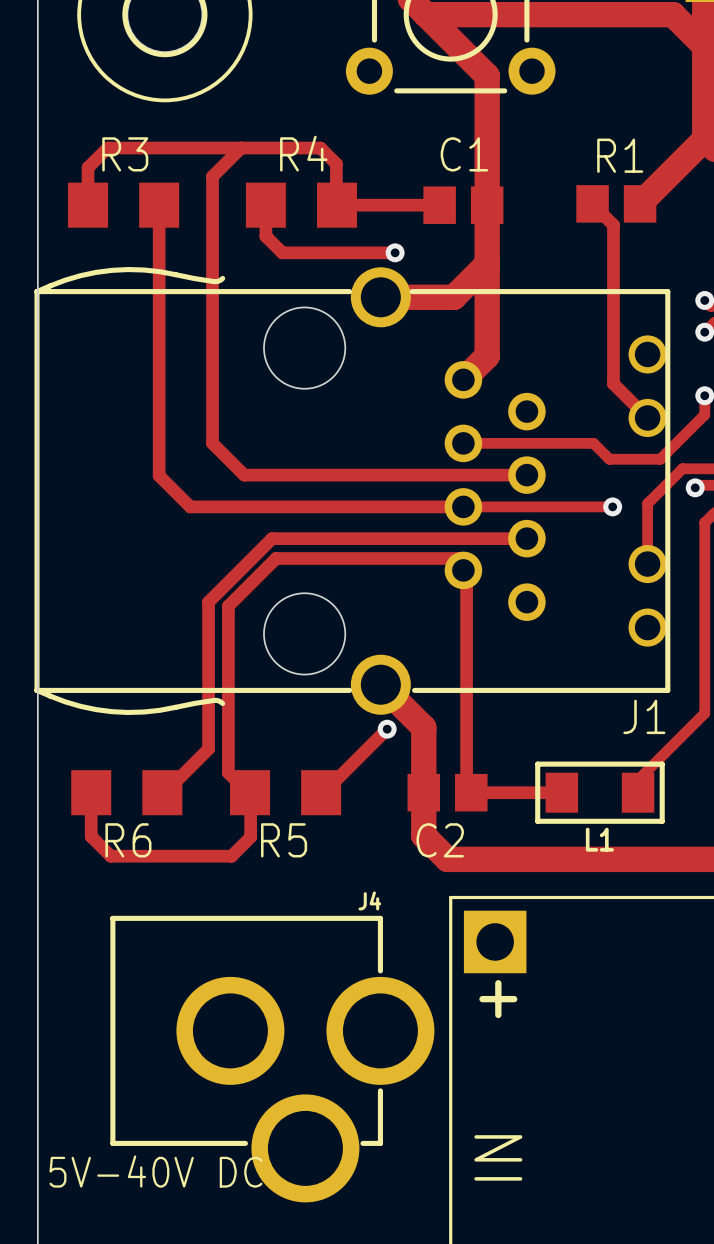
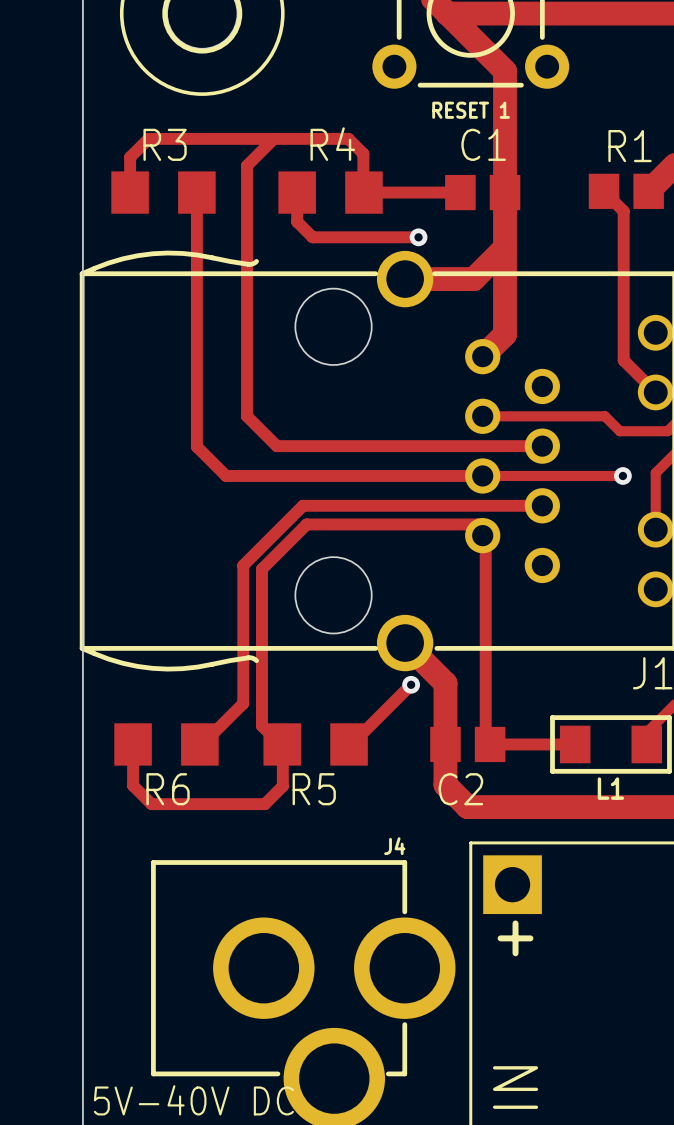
part value: none -> RESET 1 (471, 110)

